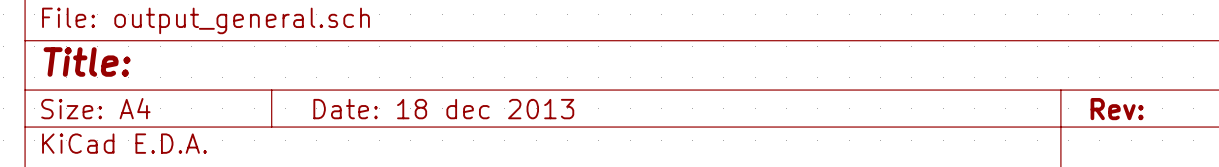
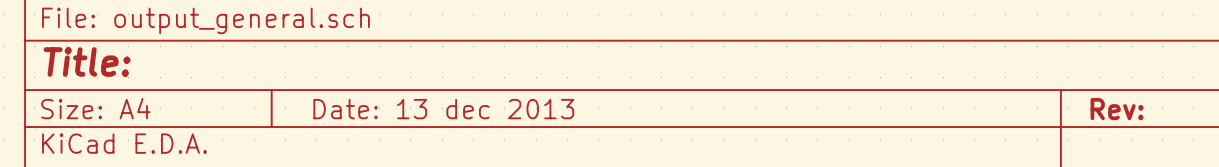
title block: Date: 18 dec 2013 (443, 109) -> Date: 13 dec 2013 (443, 109)

